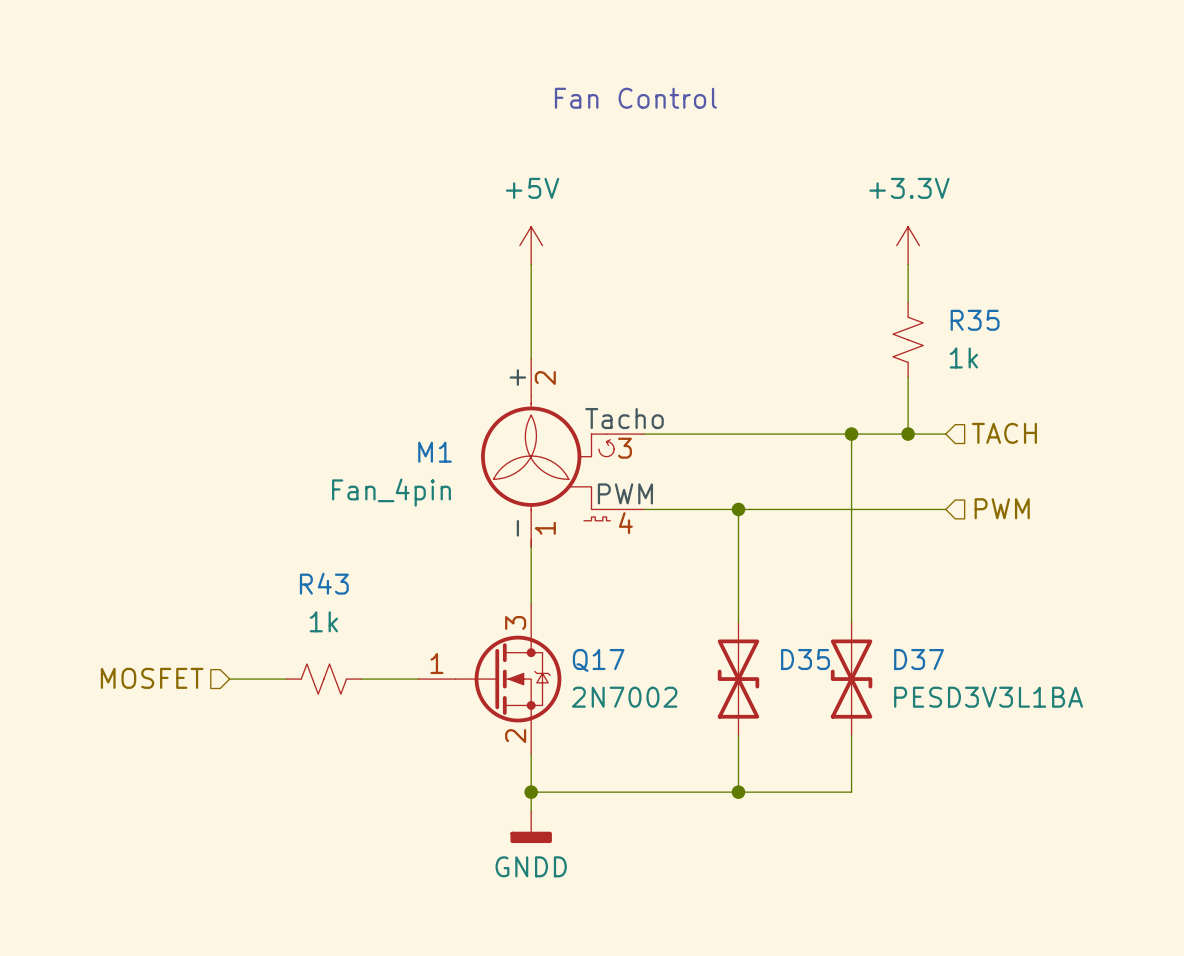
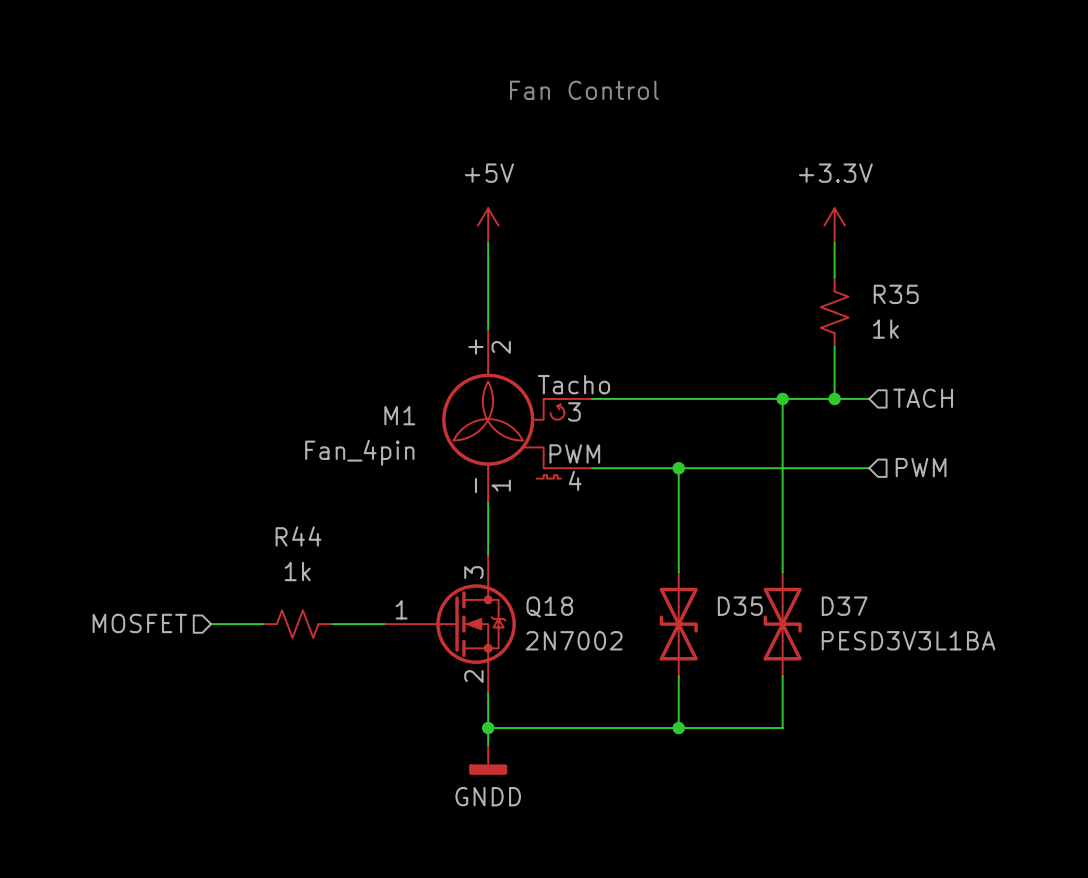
R43 name: R43 (324, 583) -> R44 (298, 536)
Q17 name: Q17 (598, 660) -> Q18 (549, 606)

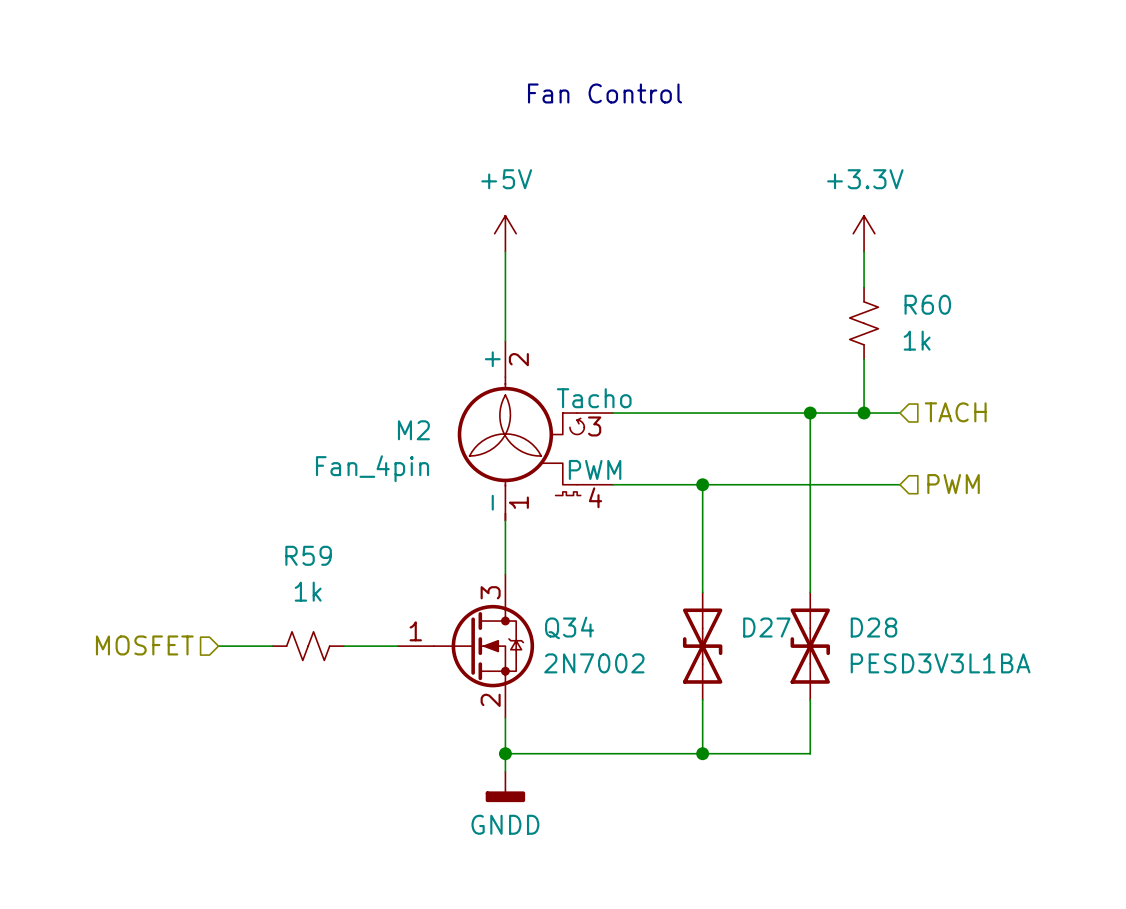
R35 name: R35 (896, 294) -> R60 (927, 304)
M1 name: M1 (399, 415) -> M2 (413, 430)
R44 name: R44 (298, 536) -> R59 (308, 555)
Q18 name: Q18 (549, 606) -> Q34 (569, 627)
D35 name: D35 (740, 606) -> D27 (766, 627)
D37 name: D37 (844, 606) -> D28 (874, 627)

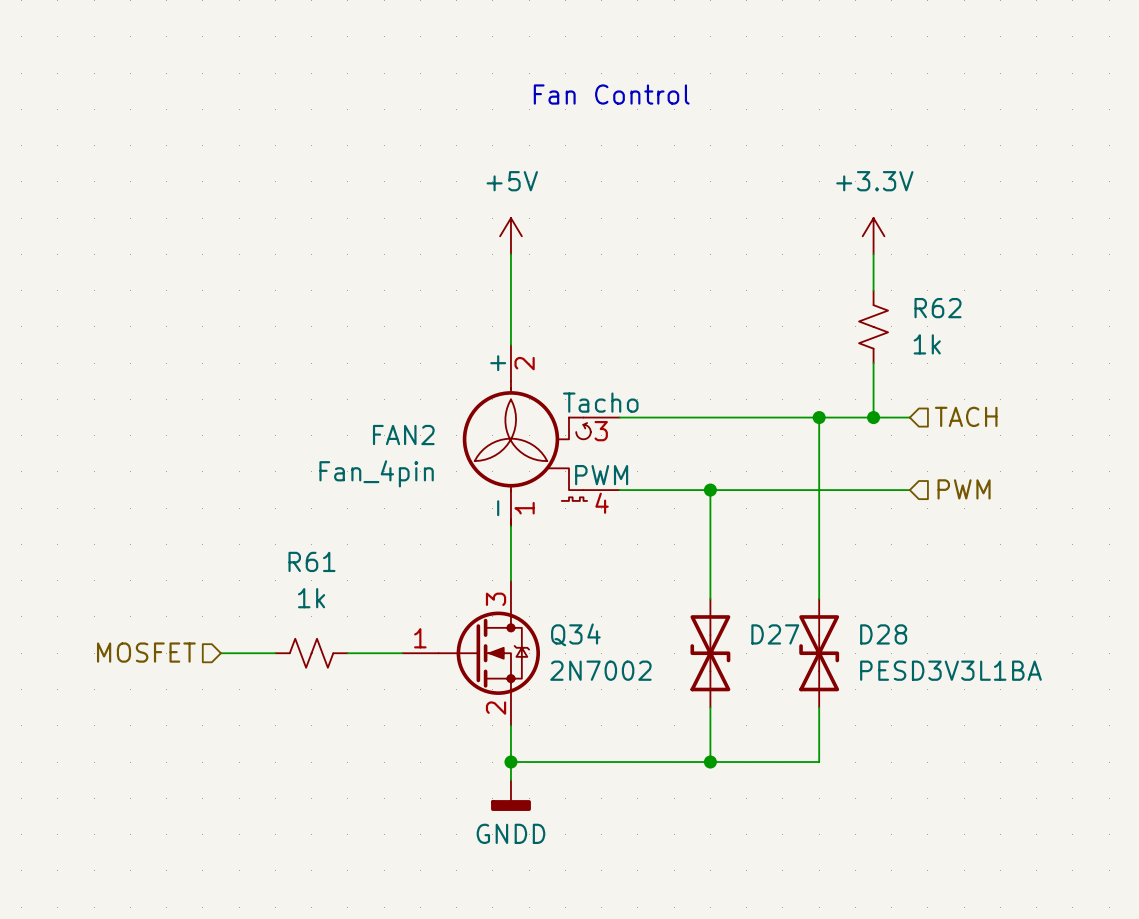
R60 name: R60 (927, 304) -> R62 (938, 308)
M2 name: M2 (413, 430) -> FAN2 (403, 435)
R59 name: R59 (308, 555) -> R61 (311, 561)

